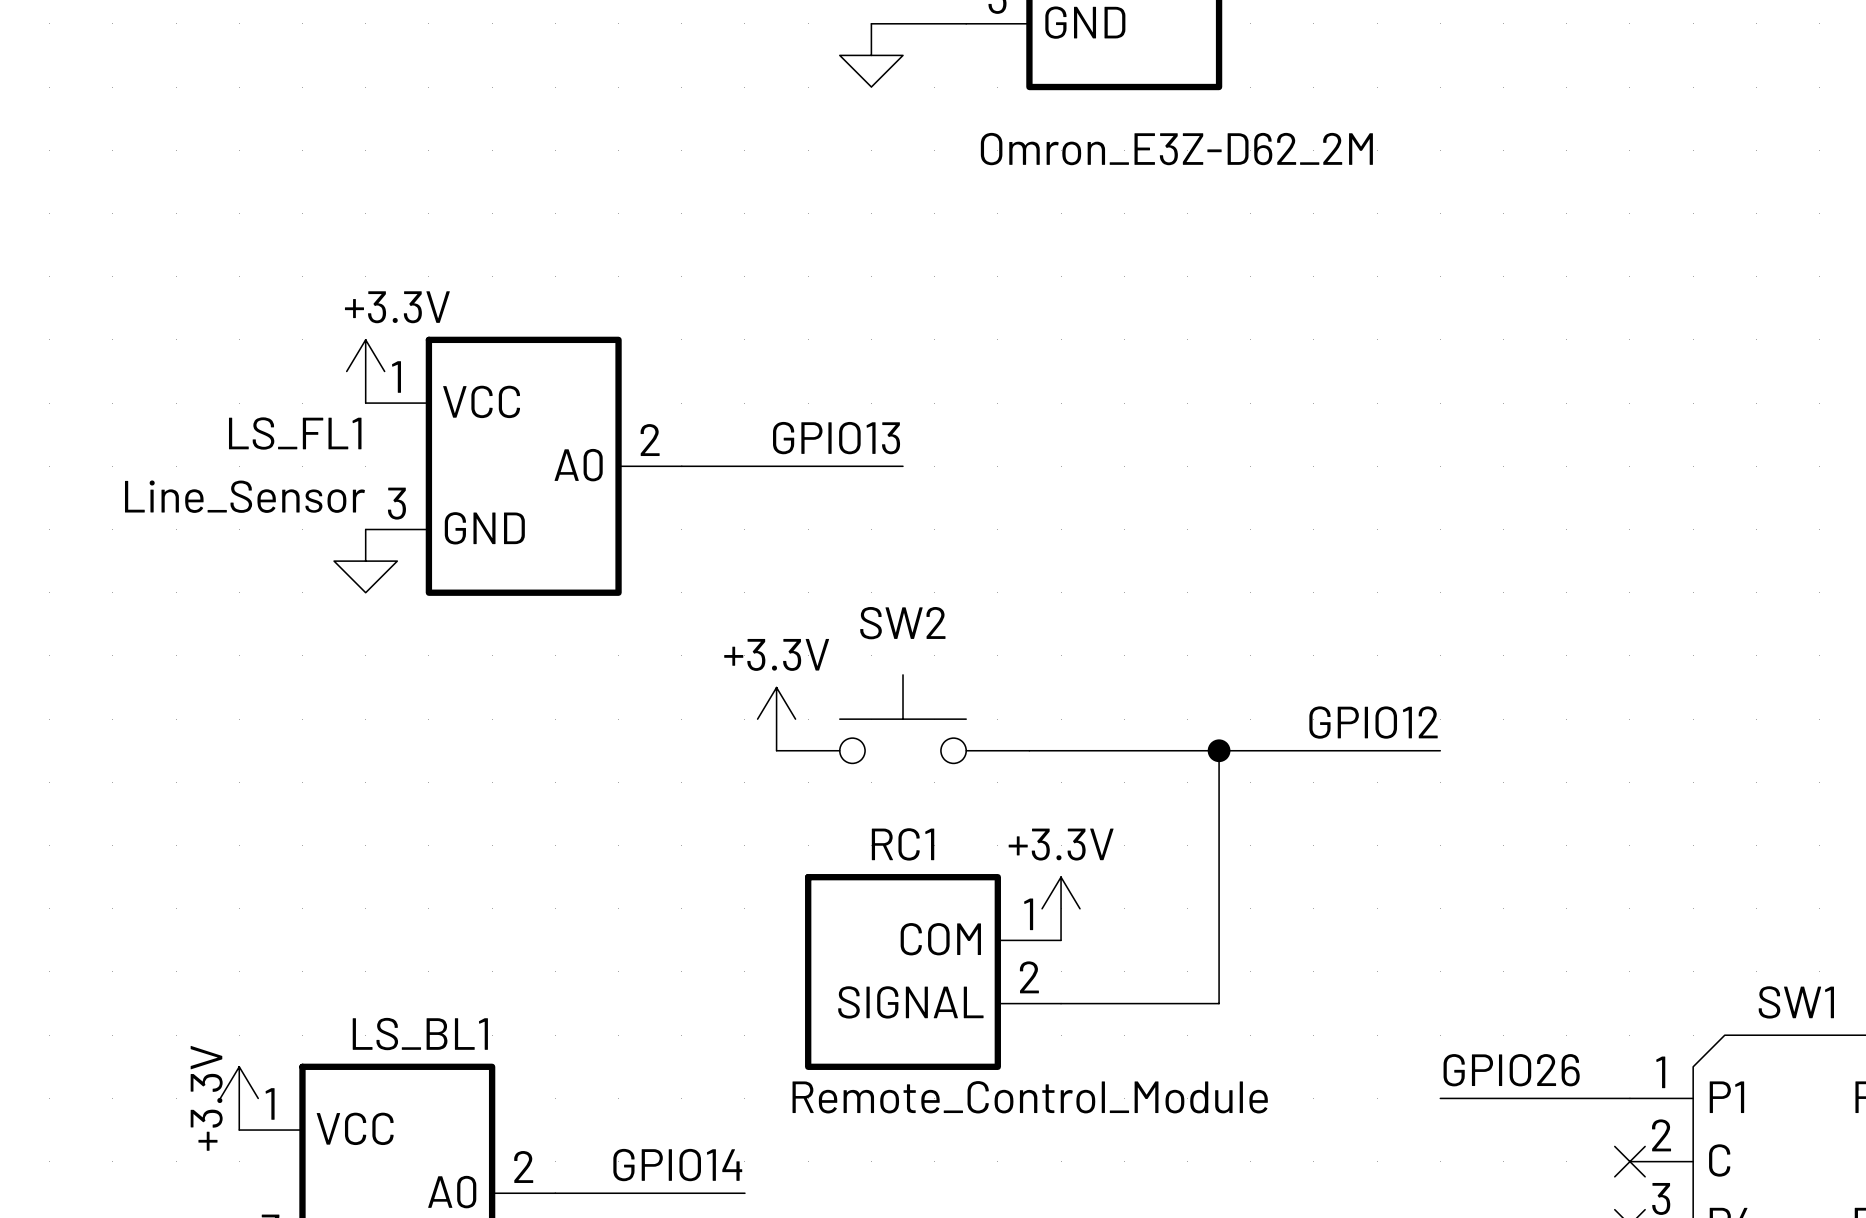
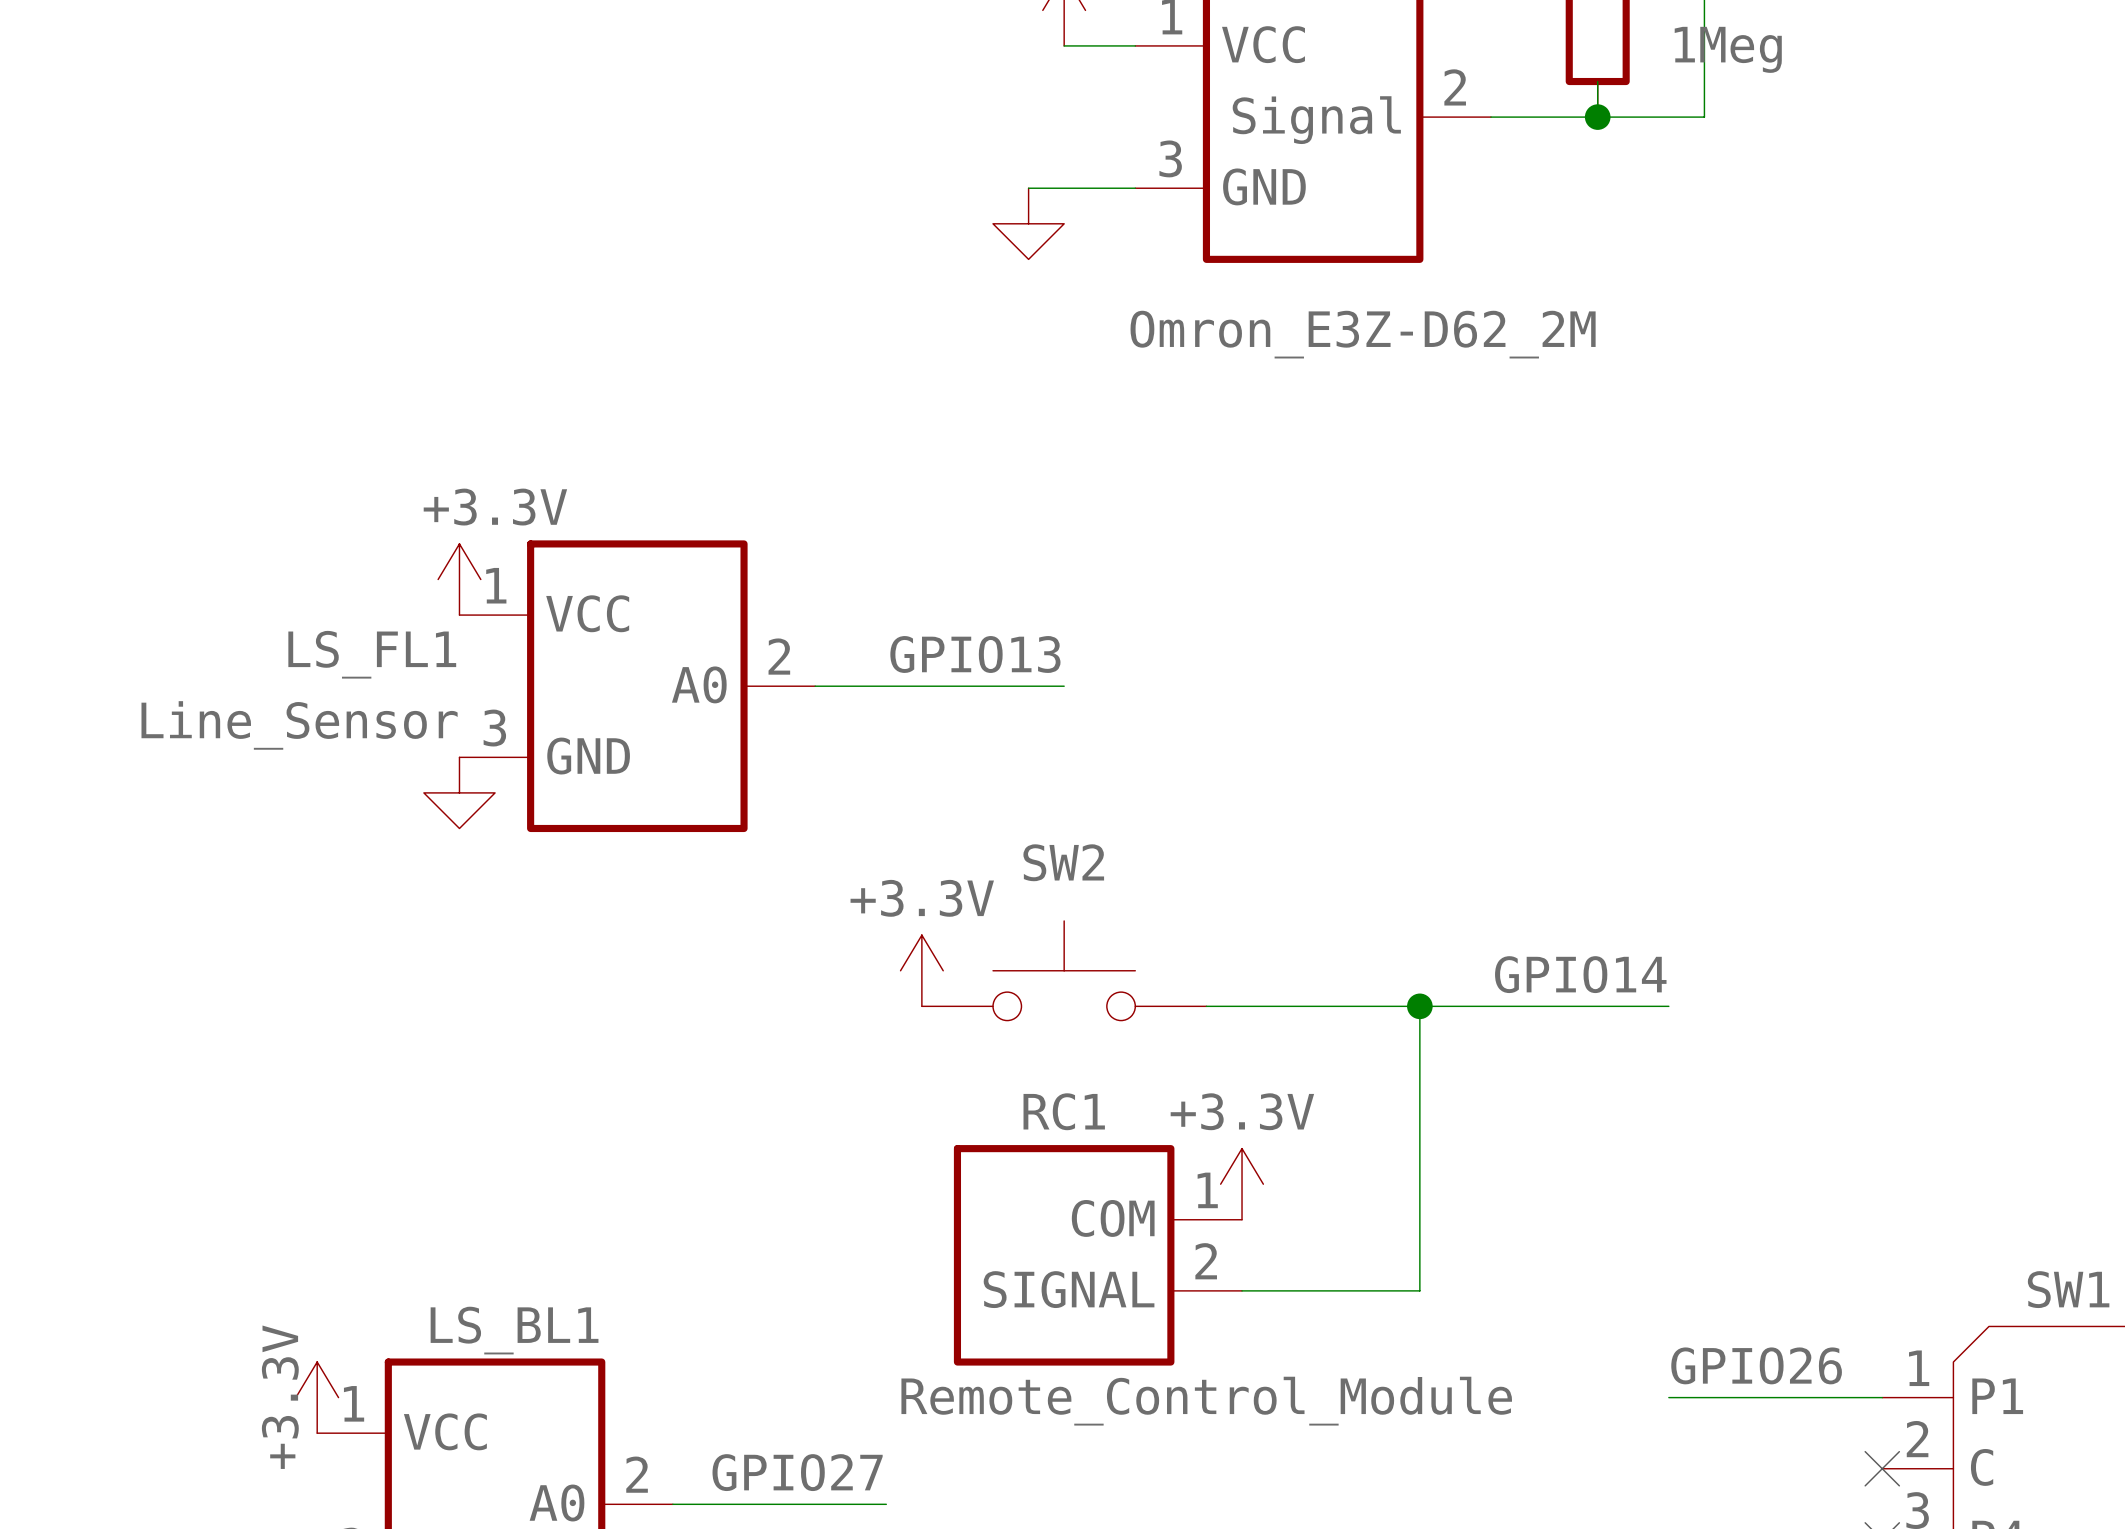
label: GPIO12 (1373, 722) -> GPIO14 (1580, 974)
label: GPIO14 (677, 1165) -> GPIO27 (797, 1472)

